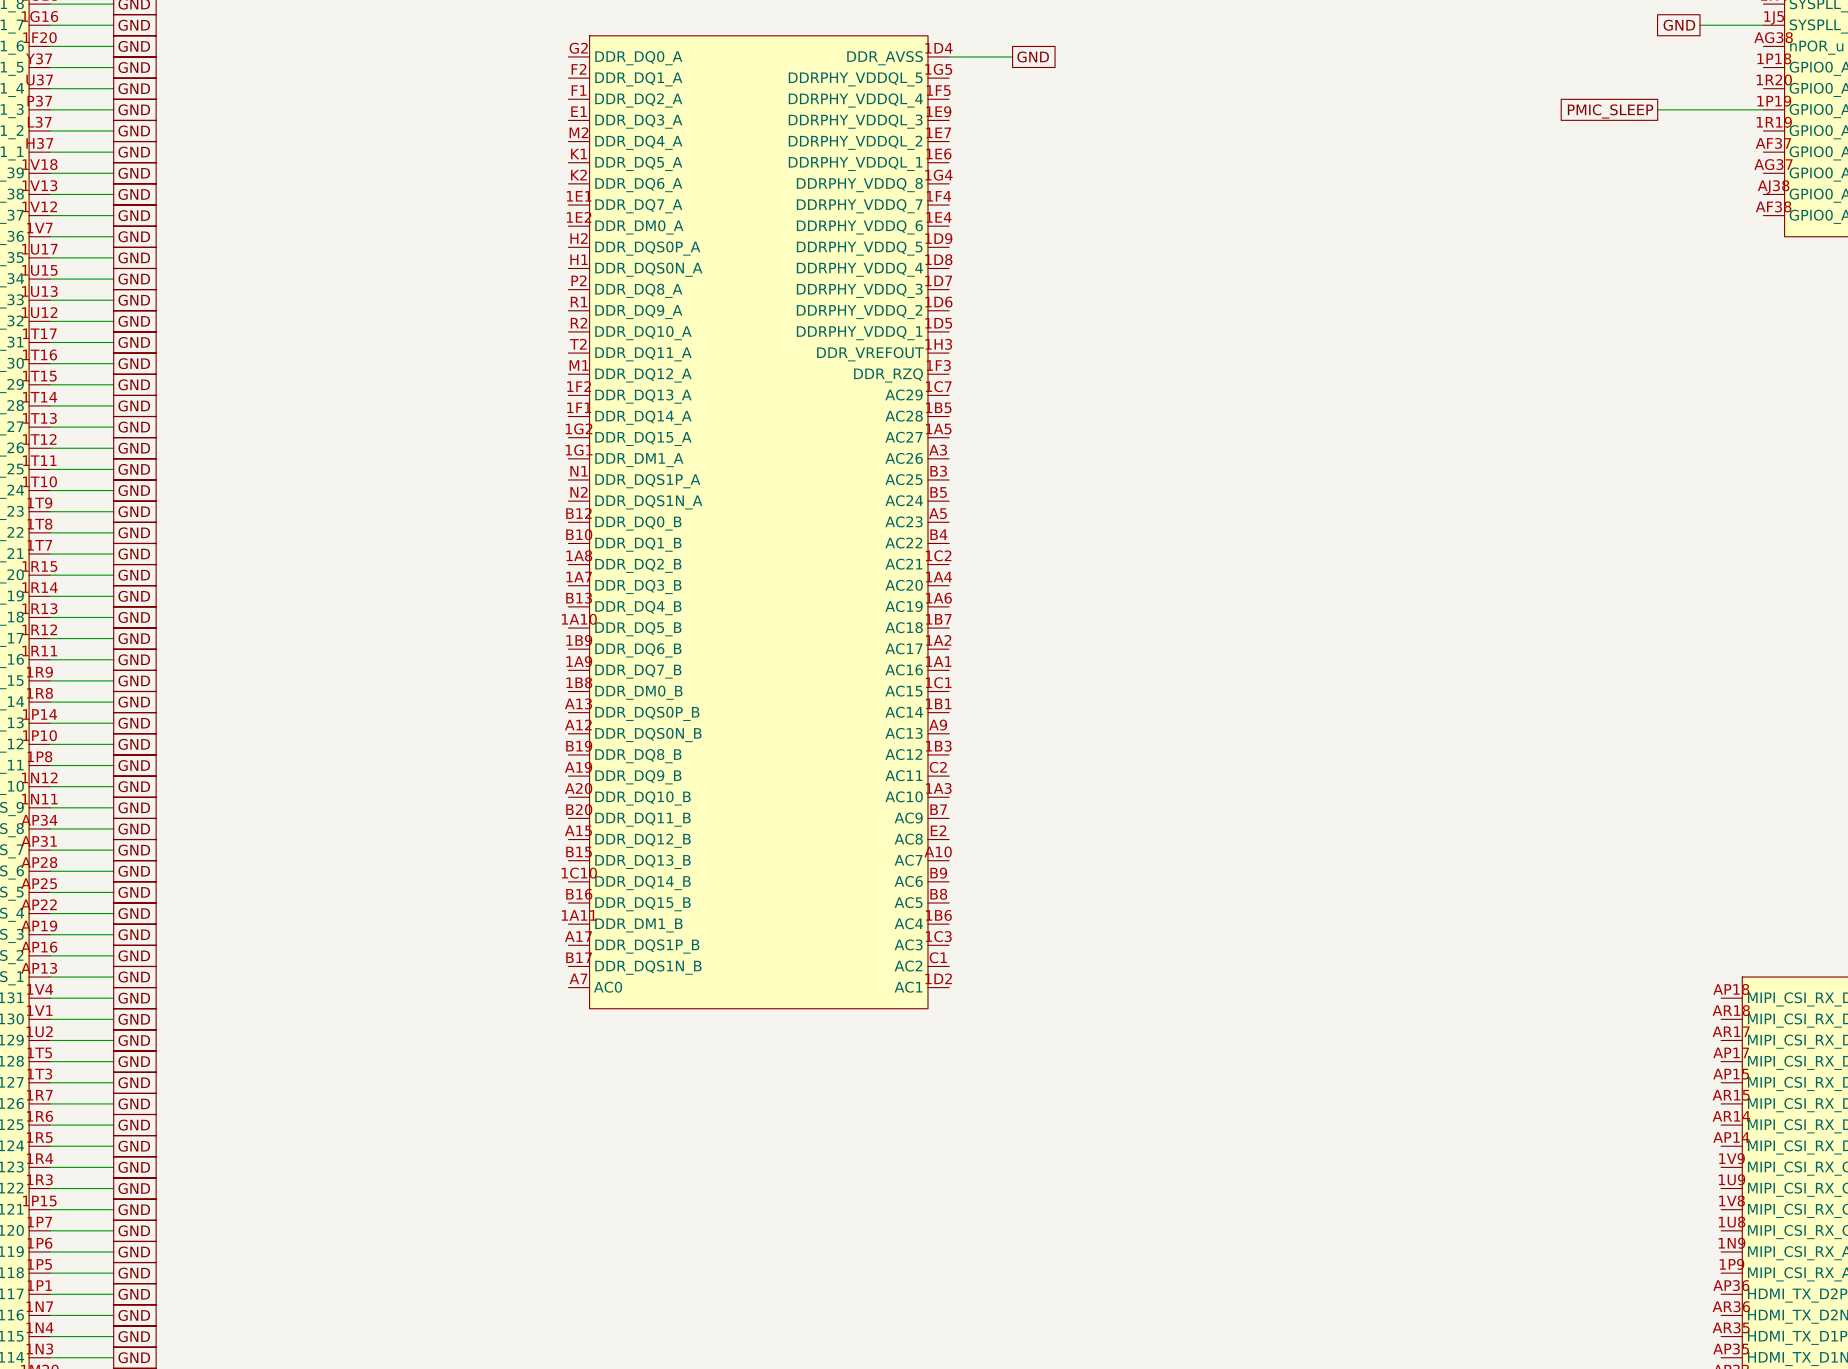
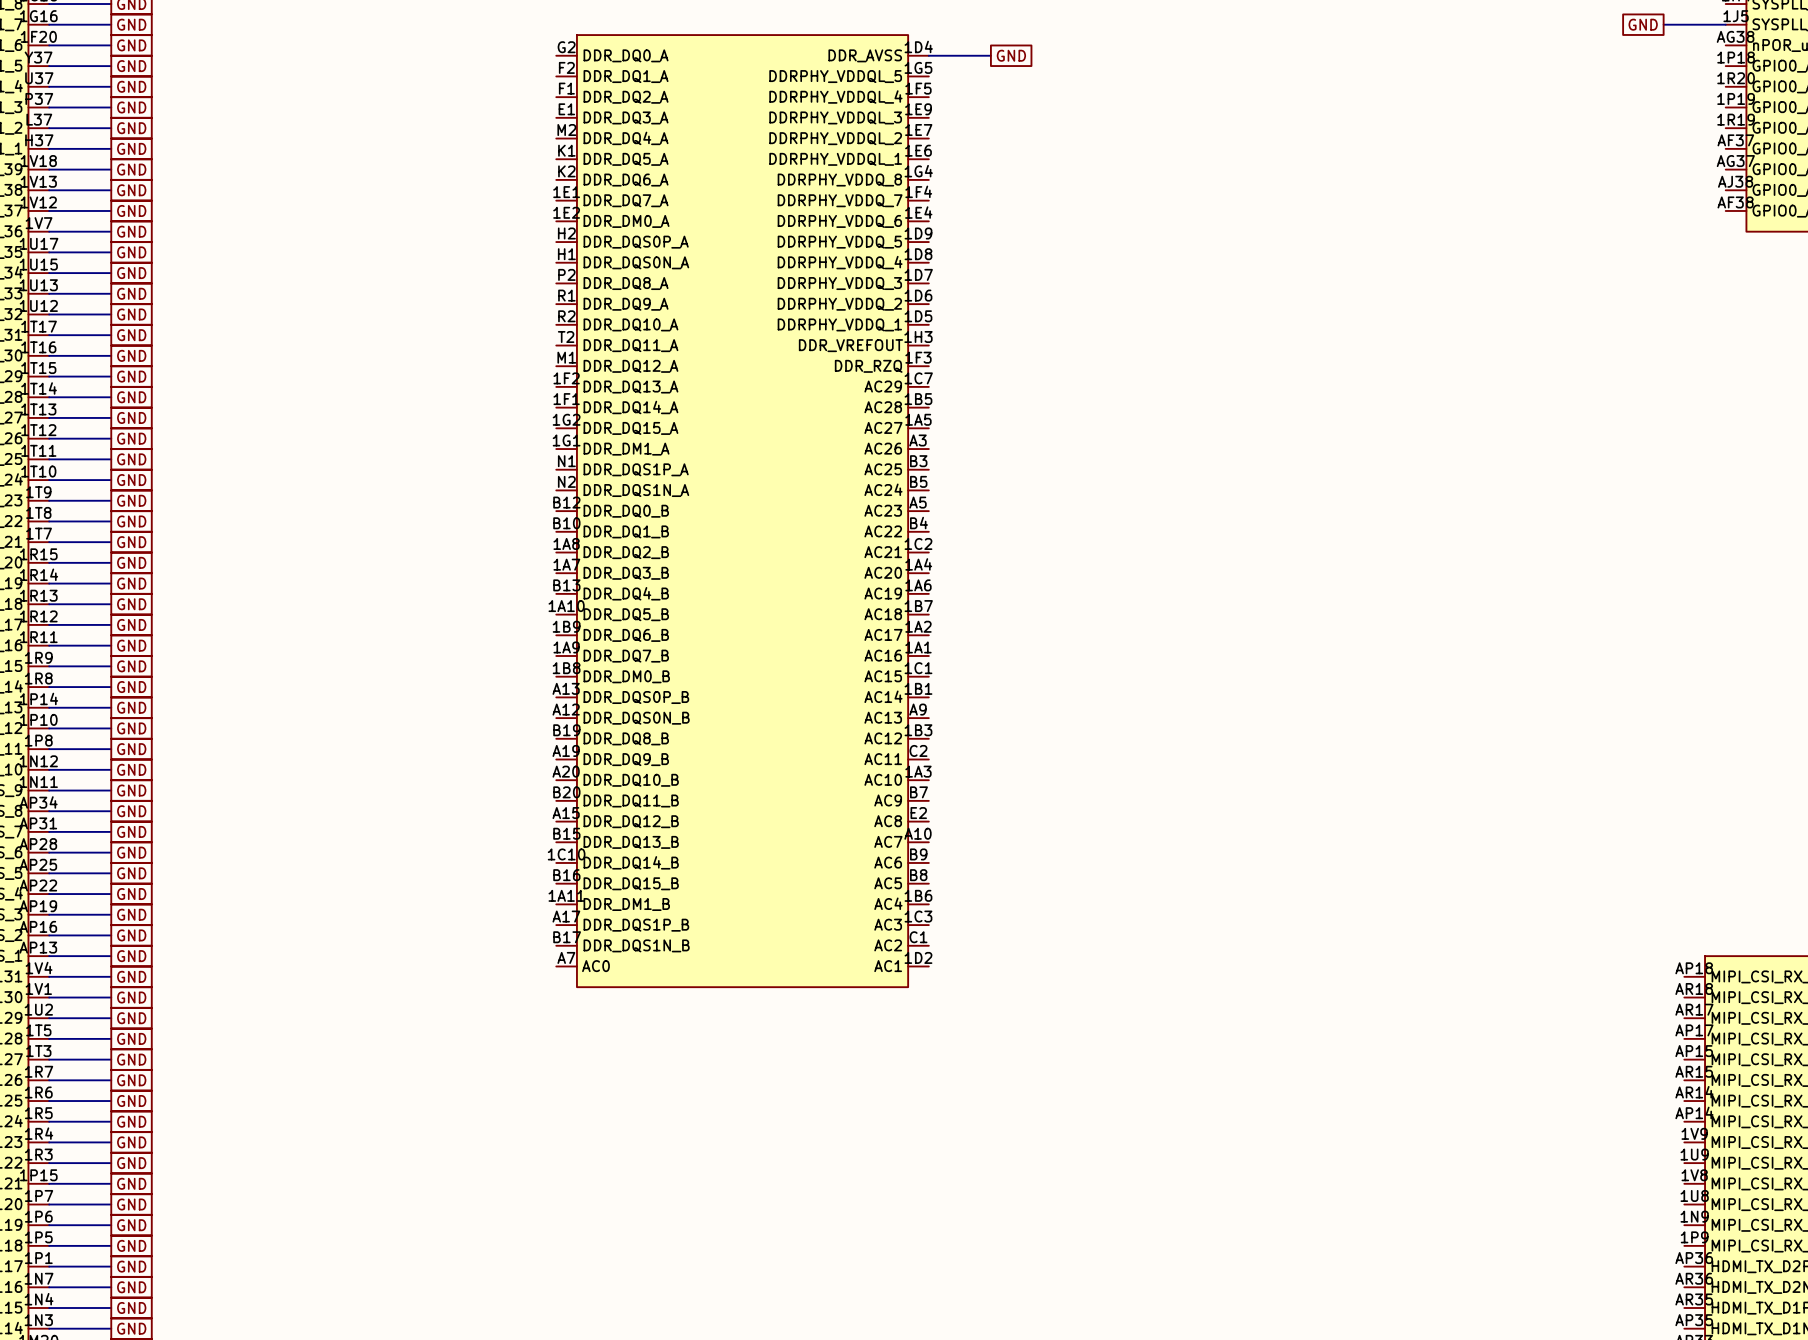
wire: (1657, 109) (1763, 109) -> none
global label: PMIC_SLEEP (1610, 111) -> none

